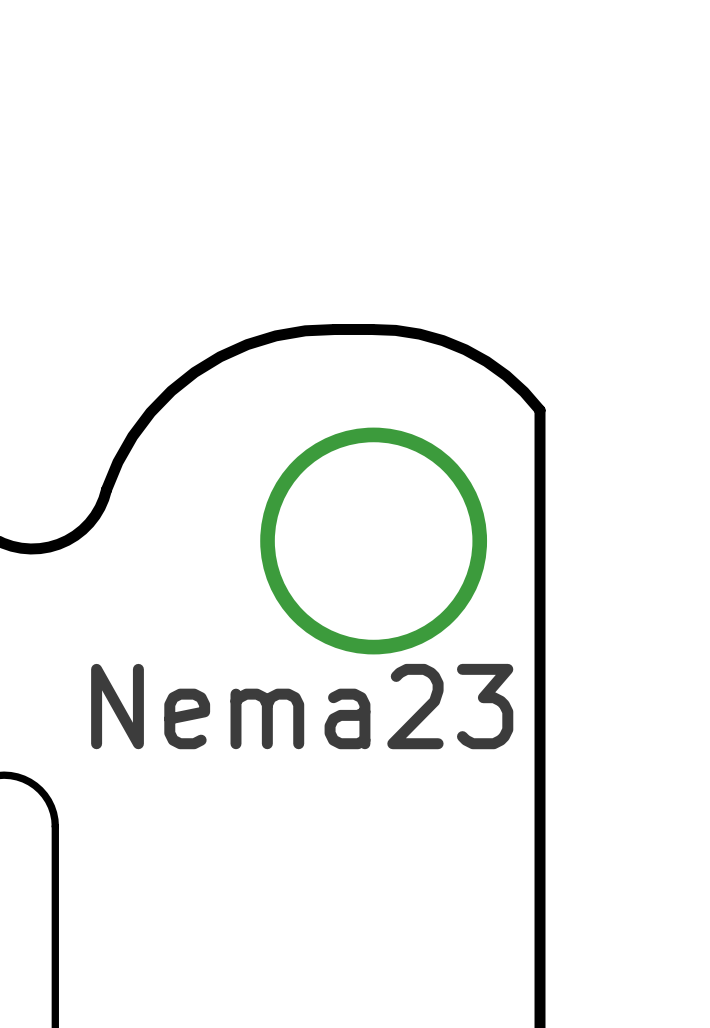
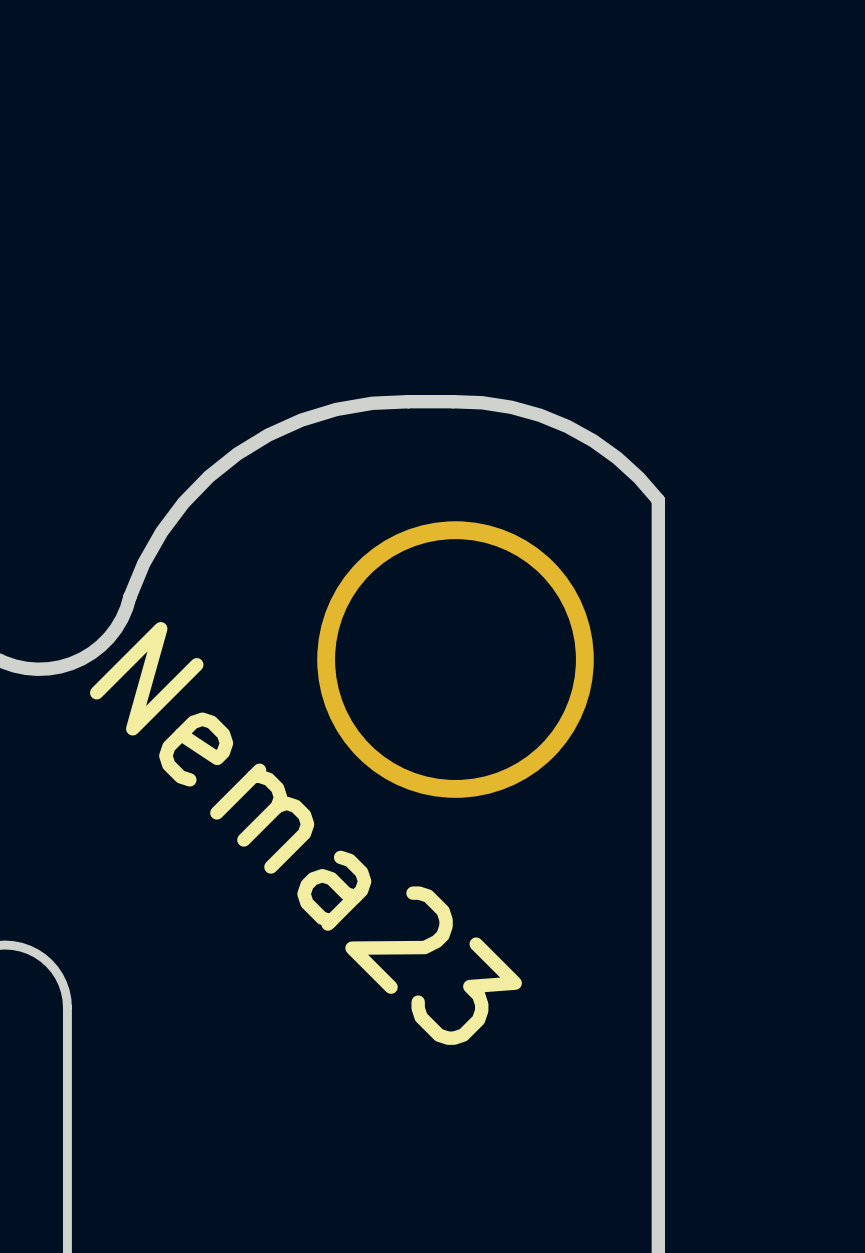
text rotation: 0° (302, 706) -> 45° clockwise (305, 833)

